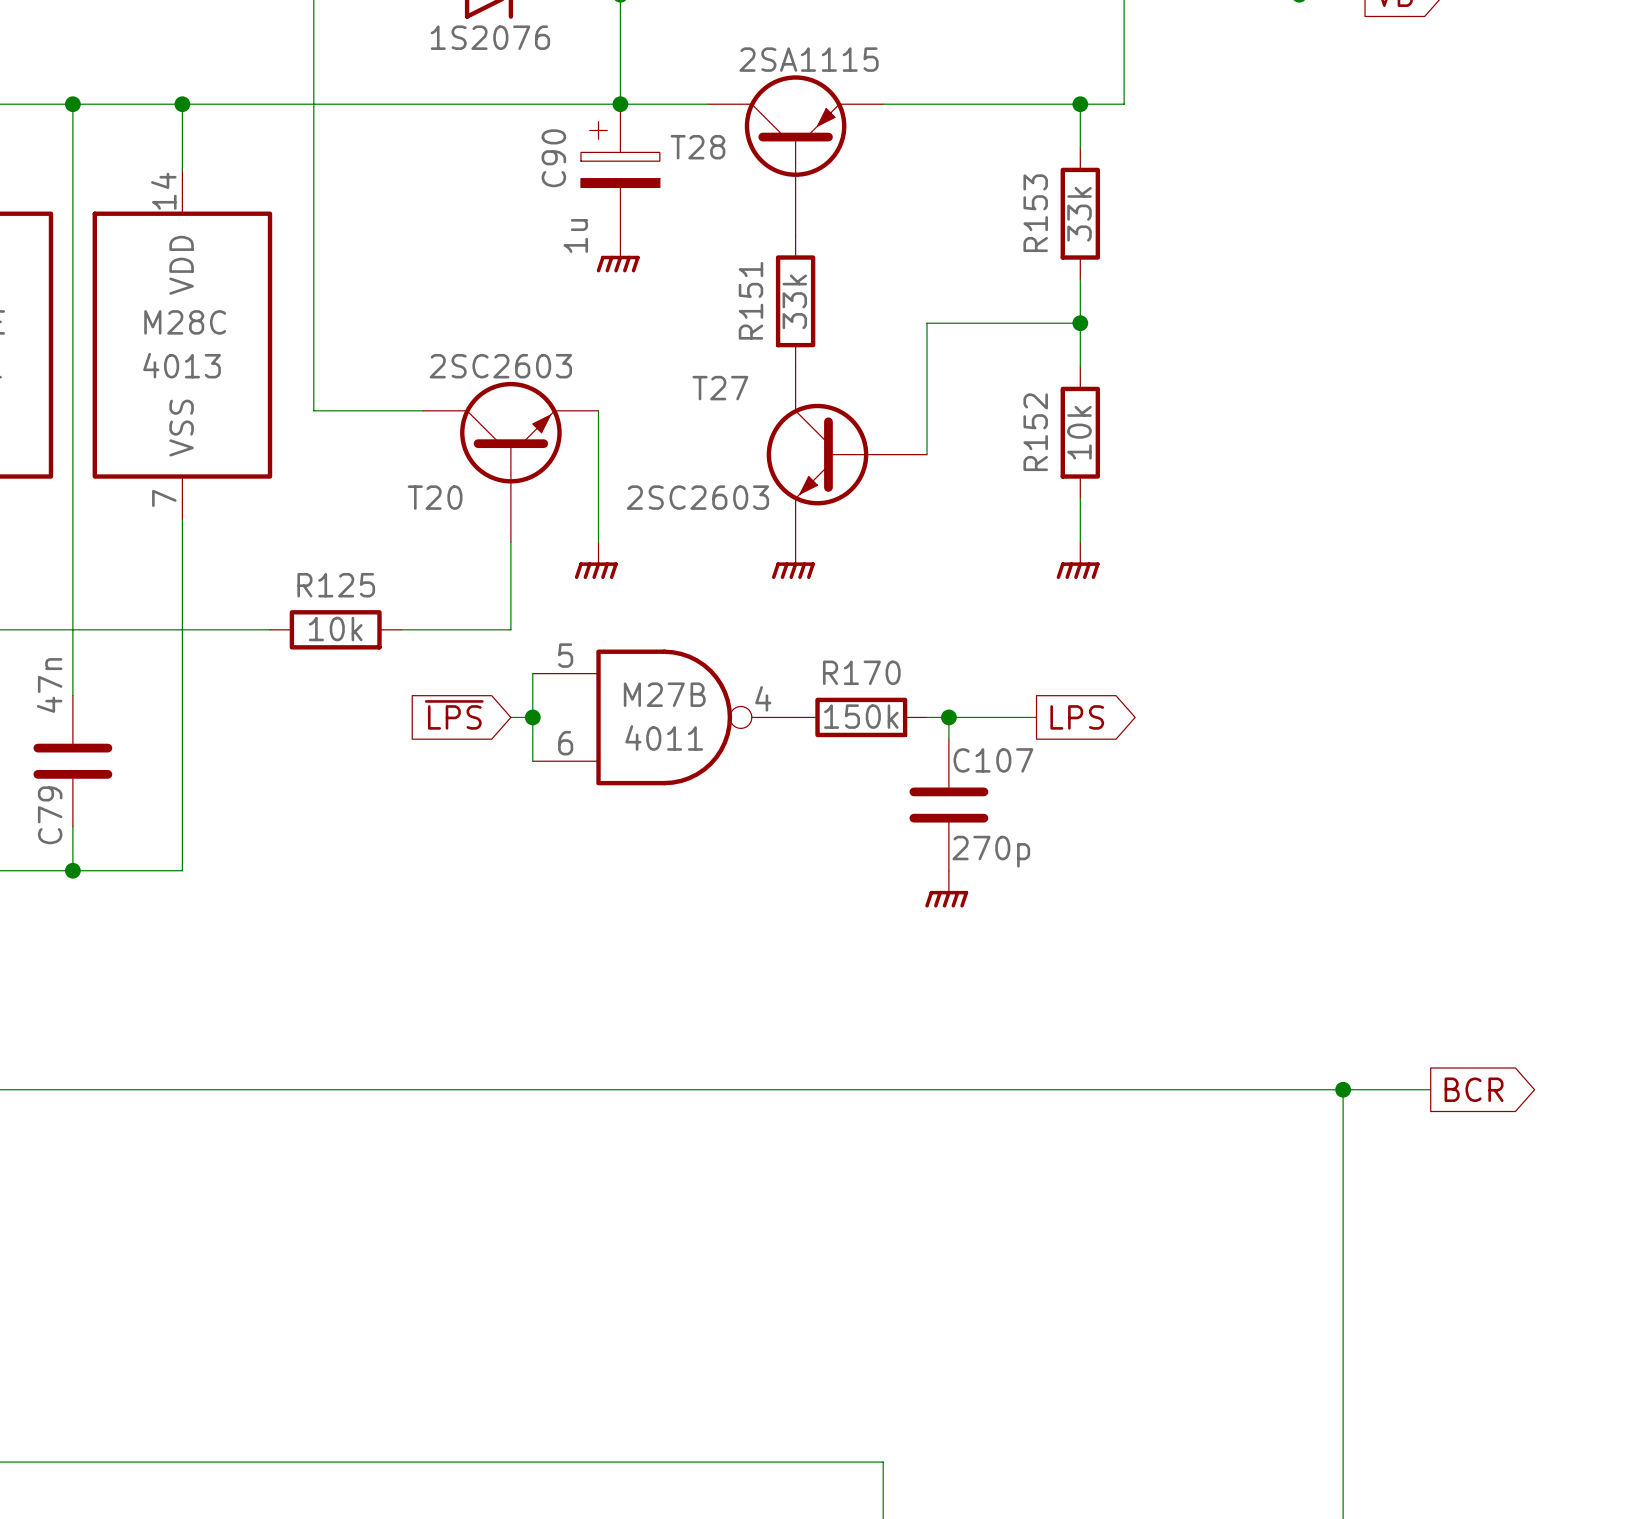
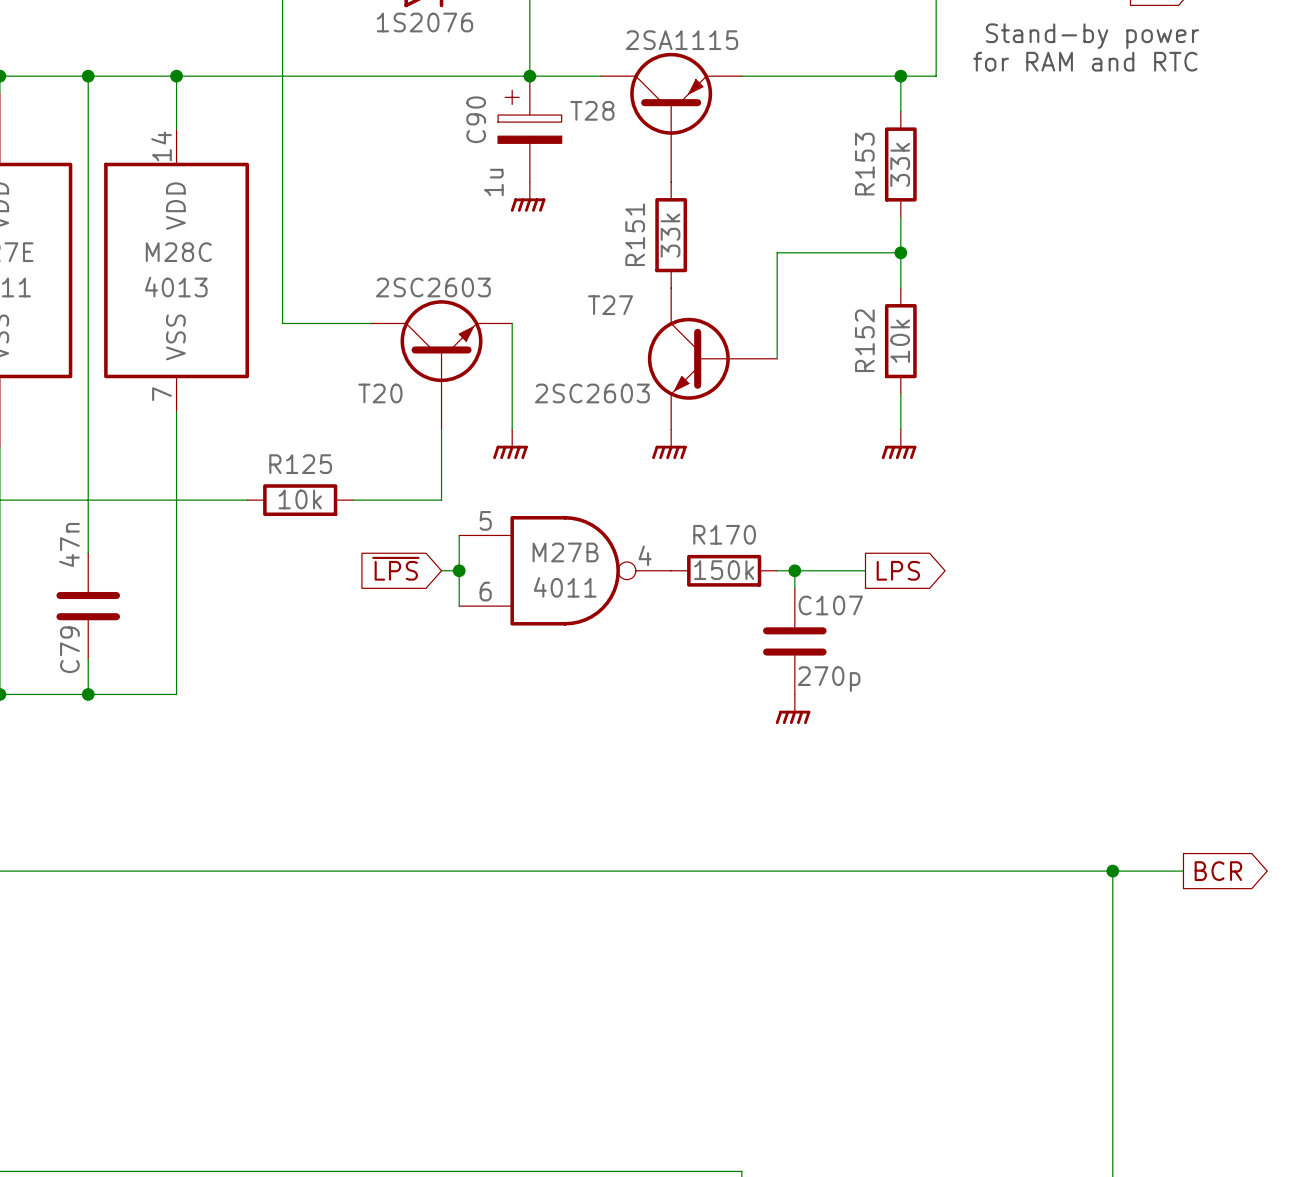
text: none -> Stand-by power (1092, 36)
text: none -> for RAM and RTC (1085, 61)

